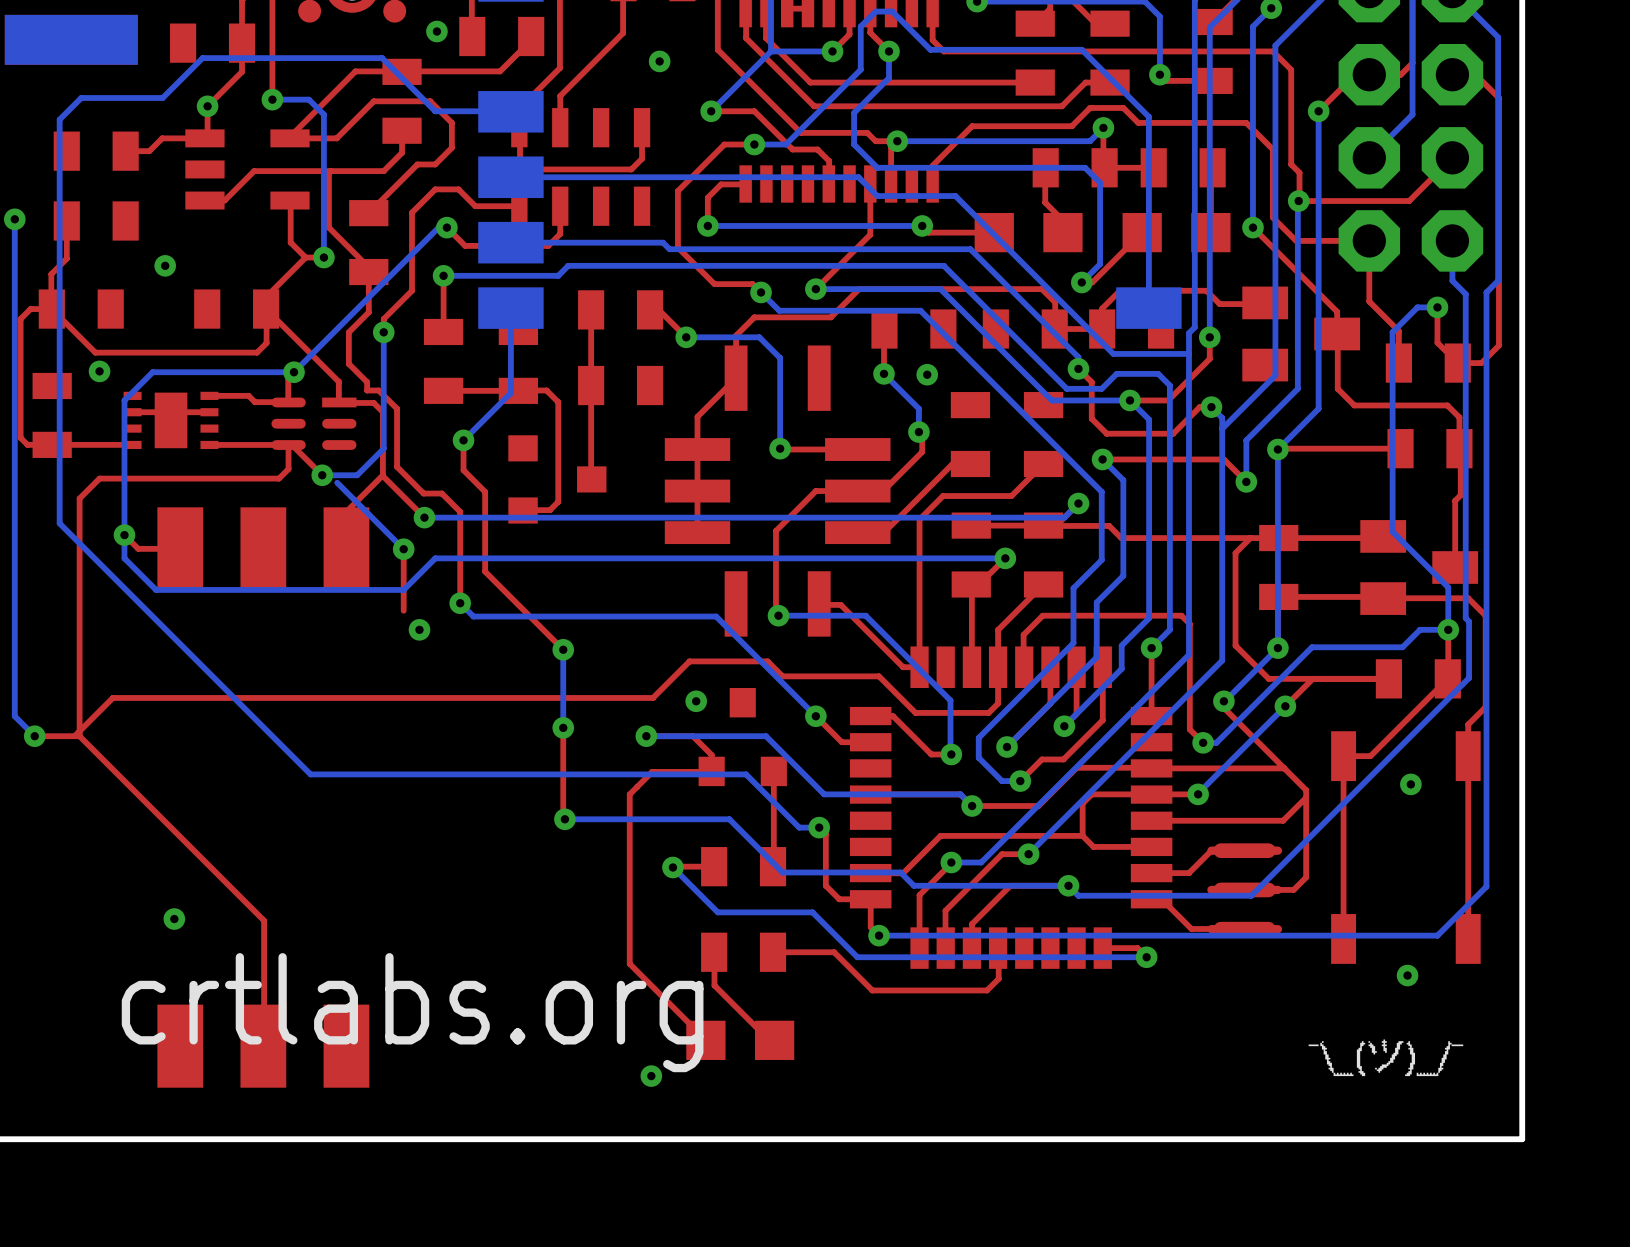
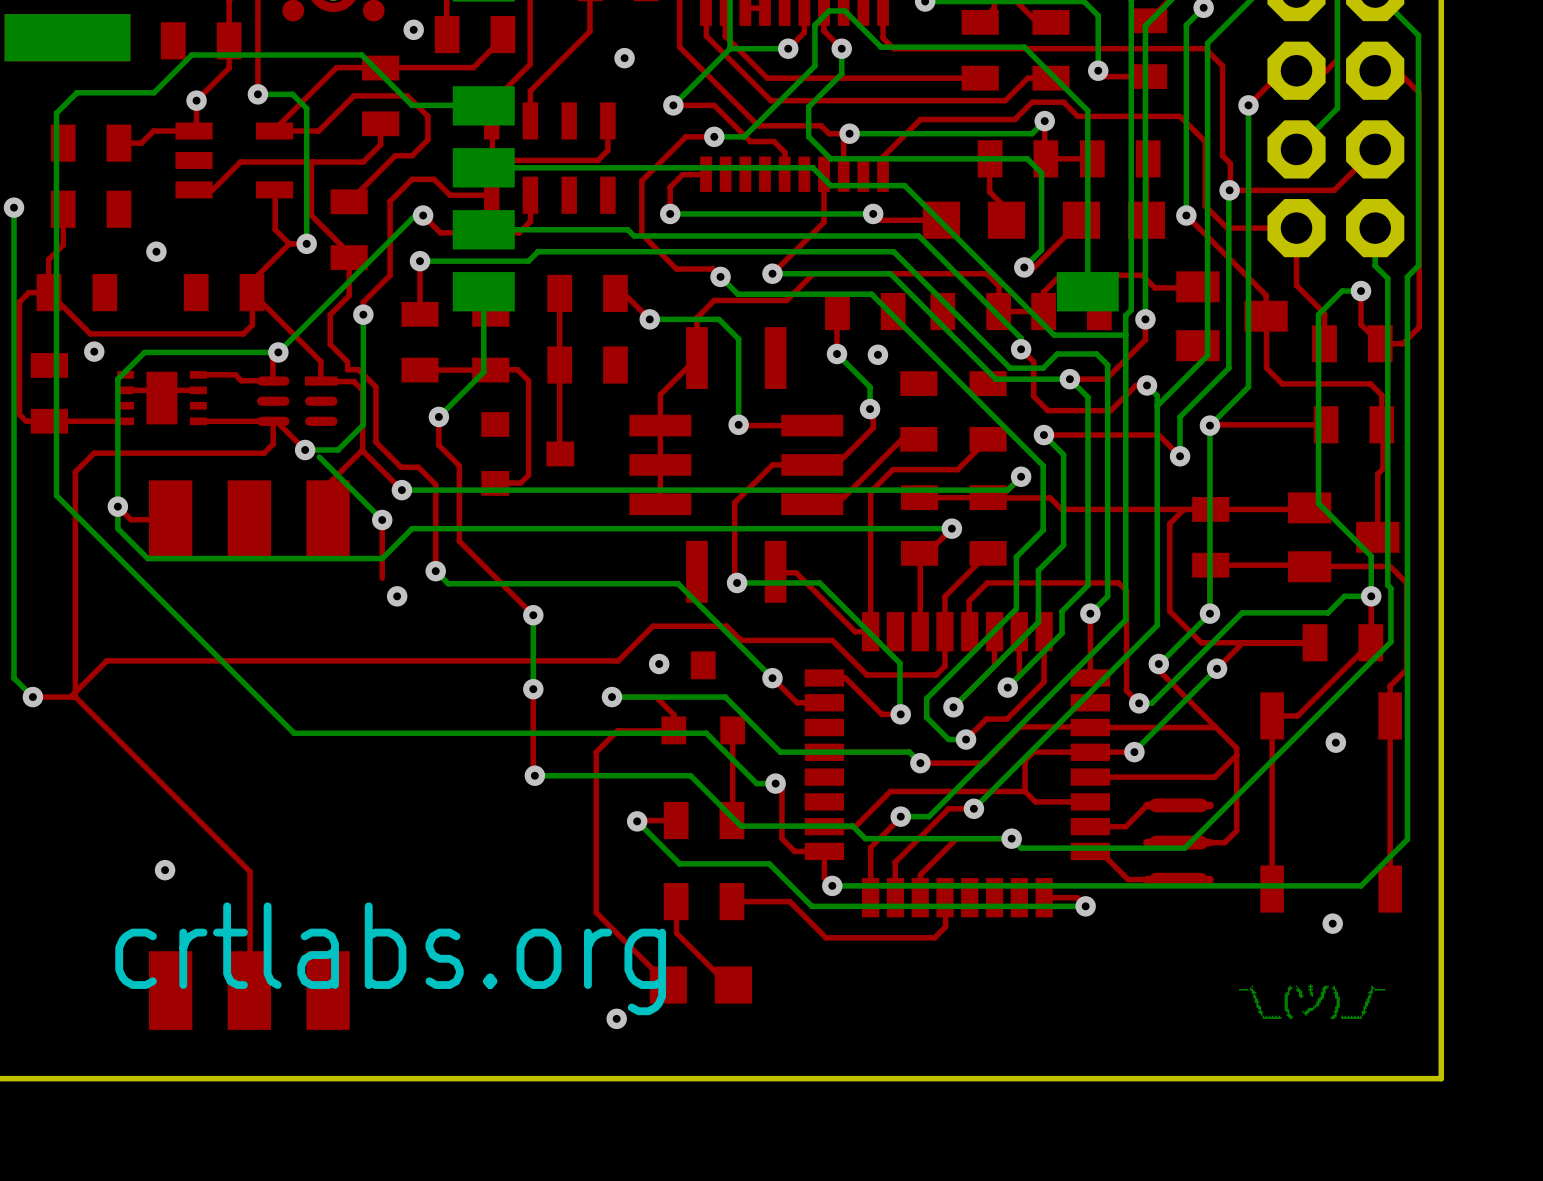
drawing shape: [1383, 1039, 1386, 1042] -> [1309, 984, 1312, 986]
drawing shape: [1321, 1041, 1324, 1043] -> [1251, 985, 1254, 988]
drawing shape: [1361, 1041, 1364, 1043] -> [1289, 985, 1292, 988]
drawing shape: [1368, 1041, 1371, 1043] -> [1295, 985, 1298, 988]
drawing shape: [1381, 1041, 1387, 1043] -> [1308, 985, 1314, 988]
drawing shape: [1398, 1041, 1404, 1043] -> [1324, 985, 1329, 988]
drawing shape: [1408, 1041, 1411, 1043] -> [1333, 985, 1336, 988]
drawing shape: [1448, 1041, 1450, 1043] -> [1371, 985, 1373, 988]
drawing shape: [1320, 1042, 1322, 1045] -> [1250, 987, 1252, 989]
drawing shape: [1360, 1042, 1366, 1045] -> [1287, 987, 1293, 989]
drawing shape: [1370, 1042, 1372, 1045] -> [1297, 987, 1299, 989]
drawing shape: [1383, 1042, 1386, 1045] -> [1309, 987, 1312, 989]
drawing shape: [1396, 1042, 1402, 1045] -> [1322, 987, 1328, 989]
drawing shape: [1406, 1042, 1411, 1045] -> [1331, 987, 1336, 989]
drawing shape: [1448, 1042, 1452, 1045] -> [1371, 987, 1375, 989]
drawing shape: [1308, 1044, 1319, 1047] -> [1239, 988, 1249, 991]
drawing shape: [1320, 1044, 1324, 1047] -> [1250, 988, 1254, 991]
drawing shape: [1360, 1044, 1364, 1047] -> [1287, 988, 1292, 991]
drawing shape: [1368, 1044, 1374, 1047] -> [1295, 988, 1301, 991]
drawing shape: [1381, 1044, 1387, 1047] -> [1308, 988, 1314, 991]
drawing shape: [1396, 1044, 1401, 1047] -> [1322, 988, 1326, 991]
drawing shape: [1408, 1044, 1412, 1047] -> [1333, 988, 1337, 991]
drawing shape: [1448, 1044, 1450, 1047] -> [1371, 988, 1373, 991]
drawing shape: [1451, 1044, 1464, 1047] -> [1374, 988, 1386, 991]
drawing shape: [1321, 1046, 1326, 1048] -> [1251, 990, 1255, 993]
drawing shape: [1360, 1046, 1362, 1048] -> [1287, 990, 1290, 993]
drawing shape: [1370, 1046, 1376, 1048] -> [1297, 990, 1303, 993]
drawing shape: [1383, 1046, 1386, 1048] -> [1309, 990, 1312, 993]
drawing shape: [1396, 1046, 1401, 1048] -> [1322, 990, 1326, 993]
drawing shape: [1410, 1046, 1412, 1048] -> [1335, 990, 1337, 993]
drawing shape: [1446, 1046, 1450, 1048] -> [1369, 990, 1373, 993]
drawing shape: [1321, 1047, 1327, 1050] -> [1251, 992, 1257, 994]
drawing shape: [1358, 1047, 1362, 1050] -> [1286, 992, 1290, 994]
drawing shape: [1371, 1047, 1376, 1050] -> [1298, 992, 1303, 994]
drawing shape: [1383, 1047, 1387, 1050] -> [1309, 992, 1314, 994]
drawing shape: [1395, 1047, 1401, 1050] -> [1320, 992, 1326, 994]
drawing shape: [1408, 1047, 1414, 1050] -> [1333, 992, 1339, 994]
drawing shape: [1444, 1047, 1450, 1050] -> [1368, 992, 1373, 994]
drawing shape: [1323, 1049, 1326, 1052] -> [1253, 993, 1255, 996]
drawing shape: [1356, 1049, 1362, 1052] -> [1284, 993, 1290, 996]
drawing shape: [1371, 1049, 1376, 1052] -> [1298, 993, 1303, 996]
drawing shape: [1383, 1049, 1387, 1052] -> [1309, 993, 1314, 996]
drawing shape: [1395, 1049, 1399, 1052] -> [1320, 993, 1325, 996]
drawing shape: [1410, 1049, 1414, 1052] -> [1335, 993, 1339, 996]
drawing shape: [1446, 1049, 1449, 1052] -> [1369, 993, 1372, 996]
drawing shape: [1323, 1051, 1327, 1053] -> [1253, 995, 1257, 997]
drawing shape: [1356, 1051, 1361, 1053] -> [1284, 995, 1288, 997]
drawing shape: [1371, 1051, 1377, 1053] -> [1298, 995, 1304, 997]
drawing shape: [1385, 1051, 1387, 1053] -> [1311, 995, 1314, 997]
drawing shape: [1395, 1051, 1399, 1053] -> [1320, 995, 1325, 997]
drawing shape: [1410, 1051, 1414, 1053] -> [1335, 995, 1339, 997]
drawing shape: [1444, 1051, 1449, 1053] -> [1368, 995, 1372, 997]
drawing shape: [1323, 1052, 1327, 1055] -> [1253, 996, 1257, 999]
drawing shape: [1356, 1052, 1361, 1055] -> [1284, 996, 1288, 999]
drawing shape: [1373, 1052, 1376, 1055] -> [1300, 996, 1303, 999]
drawing shape: [1393, 1052, 1399, 1055] -> [1319, 996, 1325, 999]
drawing shape: [1410, 1052, 1416, 1055] -> [1335, 996, 1340, 999]
drawing shape: [1444, 1052, 1449, 1055] -> [1368, 996, 1372, 999]
drawing shape: [1325, 1054, 1329, 1057] -> [1254, 998, 1258, 1000]
drawing shape: [1356, 1054, 1361, 1057] -> [1284, 998, 1288, 1000]
drawing shape: [1391, 1054, 1397, 1057] -> [1317, 998, 1323, 1000]
drawing shape: [1411, 1054, 1416, 1057] -> [1336, 998, 1340, 1000]
drawing shape: [1443, 1054, 1447, 1057] -> [1366, 998, 1370, 1000]
drawing shape: [1325, 1056, 1329, 1058] -> [1254, 999, 1258, 1002]
drawing shape: [1356, 1056, 1361, 1058] -> [1284, 999, 1288, 1002]
drawing shape: [1391, 1056, 1396, 1058] -> [1317, 999, 1321, 1002]
drawing shape: [1411, 1056, 1416, 1058] -> [1336, 999, 1340, 1002]
drawing shape: [1443, 1056, 1447, 1058] -> [1366, 999, 1370, 1002]
drawing shape: [1325, 1057, 1331, 1060] -> [1254, 1001, 1260, 1004]
drawing shape: [1356, 1057, 1361, 1060] -> [1284, 1001, 1288, 1004]
drawing shape: [1390, 1057, 1396, 1060] -> [1316, 1001, 1321, 1004]
drawing shape: [1411, 1057, 1416, 1060] -> [1336, 1001, 1340, 1004]
drawing shape: [1441, 1057, 1447, 1060] -> [1364, 1001, 1370, 1004]
drawing shape: [1326, 1059, 1329, 1062] -> [1256, 1003, 1258, 1005]
drawing shape: [1356, 1059, 1361, 1062] -> [1284, 1003, 1288, 1005]
drawing shape: [1390, 1059, 1394, 1062] -> [1316, 1003, 1320, 1005]
drawing shape: [1411, 1059, 1416, 1062] -> [1336, 1003, 1340, 1005]
drawing shape: [1441, 1059, 1445, 1062] -> [1364, 1003, 1369, 1005]
drawing shape: [1326, 1061, 1331, 1063] -> [1256, 1004, 1260, 1007]
drawing shape: [1356, 1061, 1361, 1063] -> [1284, 1004, 1288, 1007]
drawing shape: [1388, 1061, 1394, 1063] -> [1314, 1004, 1320, 1007]
drawing shape: [1411, 1061, 1416, 1063] -> [1336, 1004, 1340, 1007]
drawing shape: [1441, 1061, 1445, 1063] -> [1364, 1004, 1369, 1007]
drawing shape: [1326, 1062, 1332, 1065] -> [1256, 1006, 1262, 1008]
drawing shape: [1356, 1062, 1361, 1065] -> [1284, 1006, 1288, 1008]
drawing shape: [1386, 1062, 1391, 1065] -> [1313, 1006, 1317, 1008]
drawing shape: [1410, 1062, 1416, 1065] -> [1335, 1006, 1340, 1008]
drawing shape: [1439, 1062, 1444, 1065] -> [1363, 1006, 1367, 1008]
drawing shape: [1328, 1064, 1332, 1067] -> [1257, 1007, 1262, 1010]
drawing shape: [1356, 1064, 1361, 1067] -> [1284, 1007, 1288, 1010]
drawing shape: [1381, 1064, 1389, 1067] -> [1308, 1007, 1315, 1010]
drawing shape: [1410, 1064, 1414, 1067] -> [1335, 1007, 1339, 1010]
drawing shape: [1439, 1064, 1444, 1067] -> [1363, 1007, 1367, 1010]
drawing shape: [1330, 1066, 1332, 1068] -> [1259, 1009, 1262, 1011]
drawing shape: [1356, 1066, 1362, 1068] -> [1284, 1009, 1290, 1011]
drawing shape: [1380, 1066, 1387, 1068] -> [1306, 1009, 1314, 1011]
drawing shape: [1410, 1066, 1414, 1068] -> [1335, 1009, 1339, 1011]
drawing shape: [1439, 1066, 1442, 1068] -> [1363, 1009, 1365, 1011]
drawing shape: [1328, 1067, 1334, 1070] -> [1257, 1010, 1263, 1013]
drawing shape: [1358, 1067, 1362, 1070] -> [1286, 1010, 1290, 1013]
drawing shape: [1375, 1067, 1377, 1070] -> [1302, 1010, 1304, 1013]
drawing shape: [1378, 1067, 1384, 1070] -> [1305, 1010, 1310, 1013]
drawing shape: [1408, 1067, 1414, 1070] -> [1333, 1010, 1339, 1013]
drawing shape: [1438, 1067, 1444, 1070] -> [1361, 1010, 1367, 1013]
drawing shape: [1330, 1069, 1334, 1072] -> [1259, 1012, 1263, 1015]
drawing shape: [1360, 1069, 1362, 1072] -> [1287, 1012, 1290, 1015]
drawing shape: [1376, 1069, 1382, 1072] -> [1303, 1012, 1309, 1015]
drawing shape: [1410, 1069, 1412, 1072] -> [1335, 1012, 1337, 1015]
drawing shape: [1438, 1069, 1442, 1072] -> [1361, 1012, 1365, 1015]
drawing shape: [1331, 1071, 1334, 1073] -> [1261, 1014, 1263, 1016]
drawing shape: [1358, 1071, 1364, 1073] -> [1286, 1014, 1292, 1016]
drawing shape: [1378, 1071, 1381, 1073] -> [1305, 1014, 1307, 1016]
drawing shape: [1408, 1071, 1412, 1073] -> [1333, 1014, 1337, 1016]
drawing shape: [1438, 1071, 1440, 1073] -> [1361, 1014, 1364, 1016]
drawing shape: [1333, 1072, 1336, 1075] -> [1262, 1015, 1265, 1018]
drawing shape: [1336, 1072, 1339, 1075] -> [1265, 1015, 1268, 1018]
drawing shape: [1340, 1072, 1342, 1075] -> [1268, 1015, 1271, 1018]
drawing shape: [1343, 1072, 1346, 1075] -> [1272, 1015, 1274, 1018]
drawing shape: [1346, 1072, 1349, 1075] -> [1275, 1015, 1277, 1018]
drawing shape: [1350, 1072, 1352, 1075] -> [1278, 1015, 1280, 1018]
drawing shape: [1360, 1072, 1366, 1075] -> [1287, 1015, 1293, 1018]
drawing shape: [1406, 1072, 1412, 1075] -> [1331, 1015, 1337, 1018]
drawing shape: [1416, 1072, 1419, 1075] -> [1341, 1015, 1343, 1018]
drawing shape: [1420, 1072, 1422, 1075] -> [1344, 1015, 1347, 1018]
drawing shape: [1423, 1072, 1426, 1075] -> [1347, 1015, 1350, 1018]
drawing shape: [1426, 1072, 1429, 1075] -> [1350, 1015, 1353, 1018]
drawing shape: [1429, 1072, 1432, 1075] -> [1353, 1015, 1356, 1018]
drawing shape: [1433, 1072, 1435, 1075] -> [1357, 1015, 1359, 1018]
drawing shape: [1436, 1072, 1439, 1075] -> [1360, 1015, 1362, 1018]
drawing shape: [1333, 1074, 1354, 1077] -> [1262, 1017, 1282, 1019]
drawing shape: [1361, 1074, 1366, 1077] -> [1289, 1017, 1293, 1019]
drawing shape: [1405, 1074, 1411, 1077] -> [1330, 1017, 1336, 1019]
drawing shape: [1416, 1074, 1439, 1077] -> [1341, 1017, 1362, 1019]

